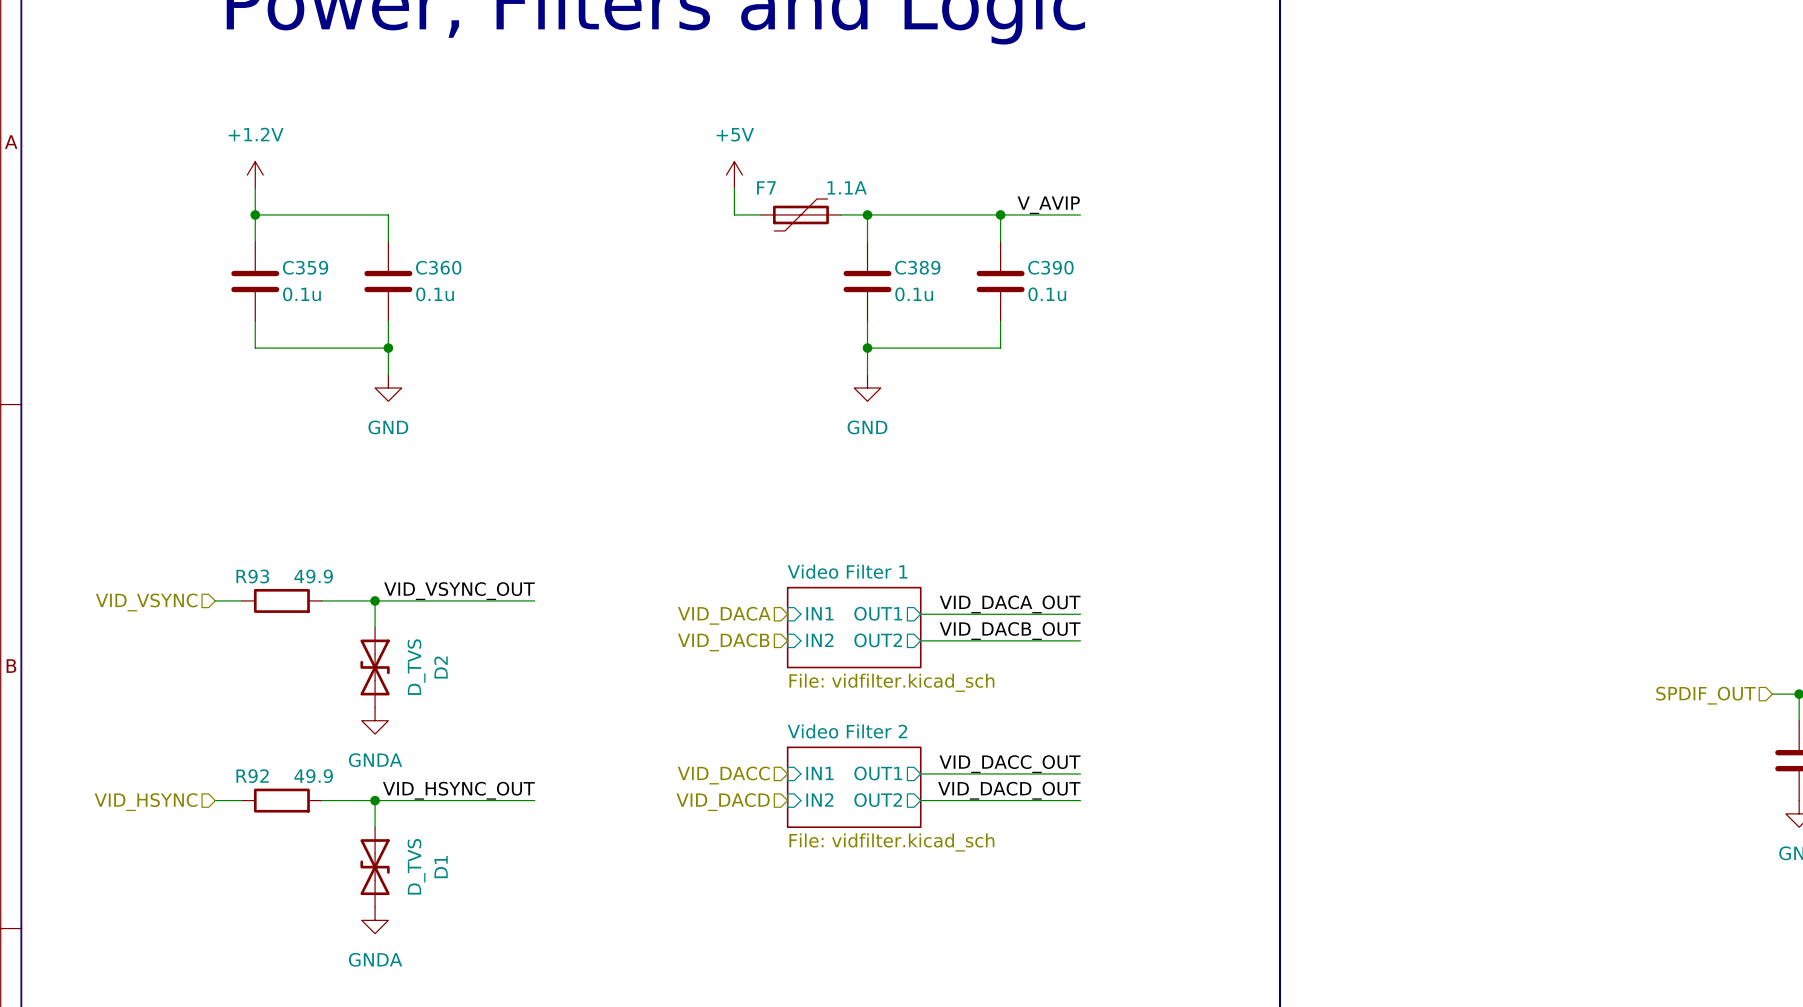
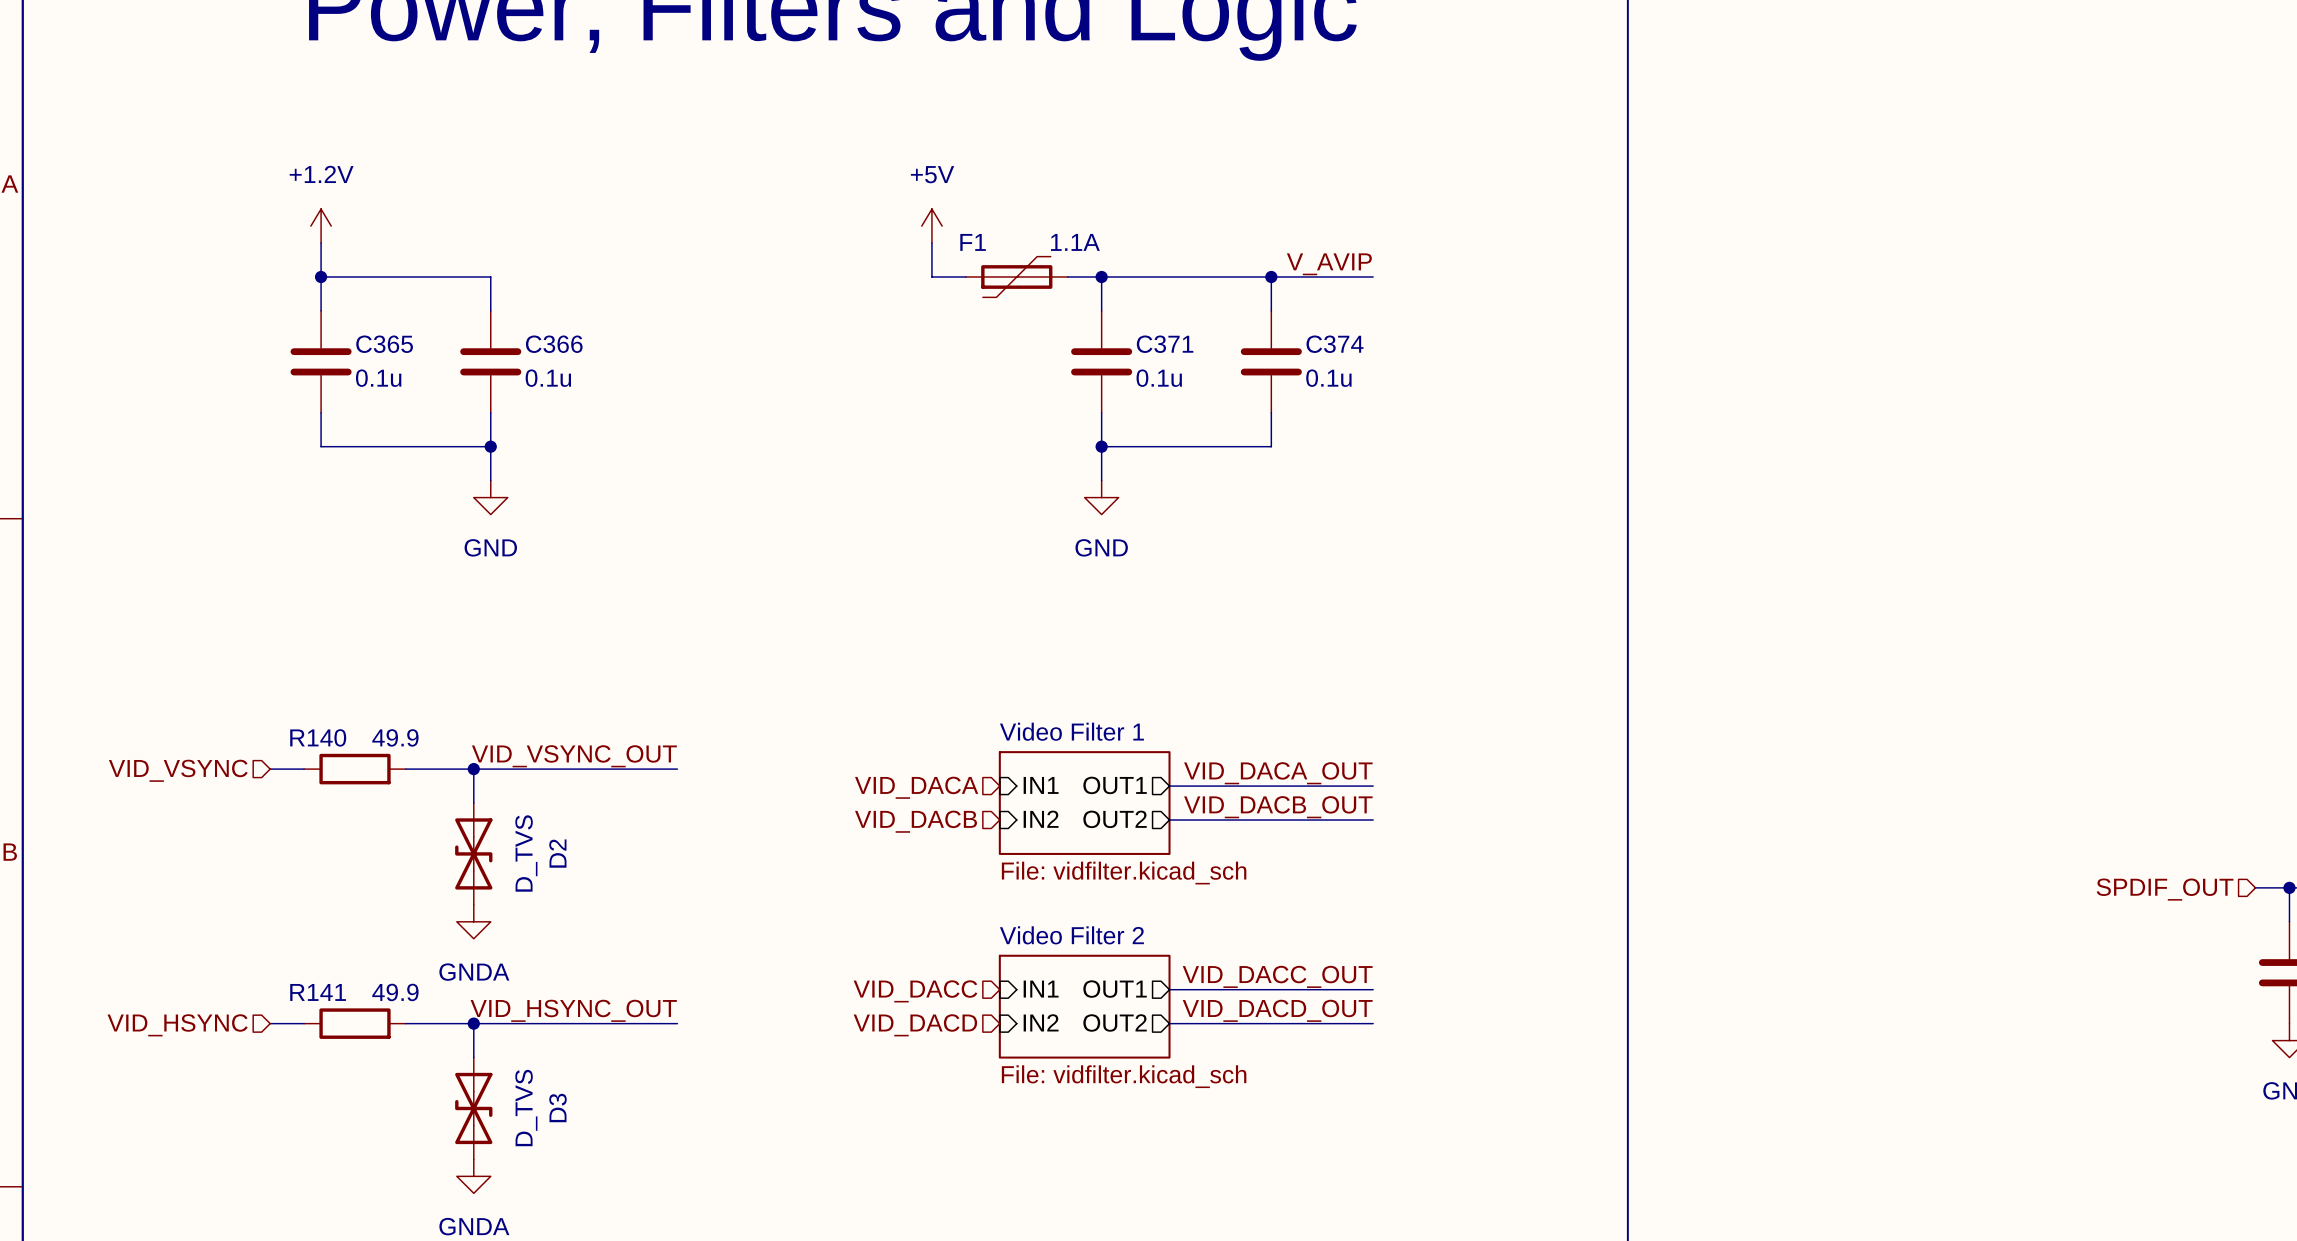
F7 name: F7 (766, 187) -> F1 (973, 242)
C359 name: C359 (305, 267) -> C365 (384, 344)
C360 name: C360 (438, 267) -> C366 (554, 344)
C389 name: C389 (917, 267) -> C371 (1165, 344)
C390 name: C390 (1050, 267) -> C374 (1335, 344)
R93 name: R93 (252, 576) -> R140 (318, 737)
R92 name: R92 (252, 776) -> R141 (318, 992)
D1 name: D1 (441, 867) -> D3 (557, 1108)

